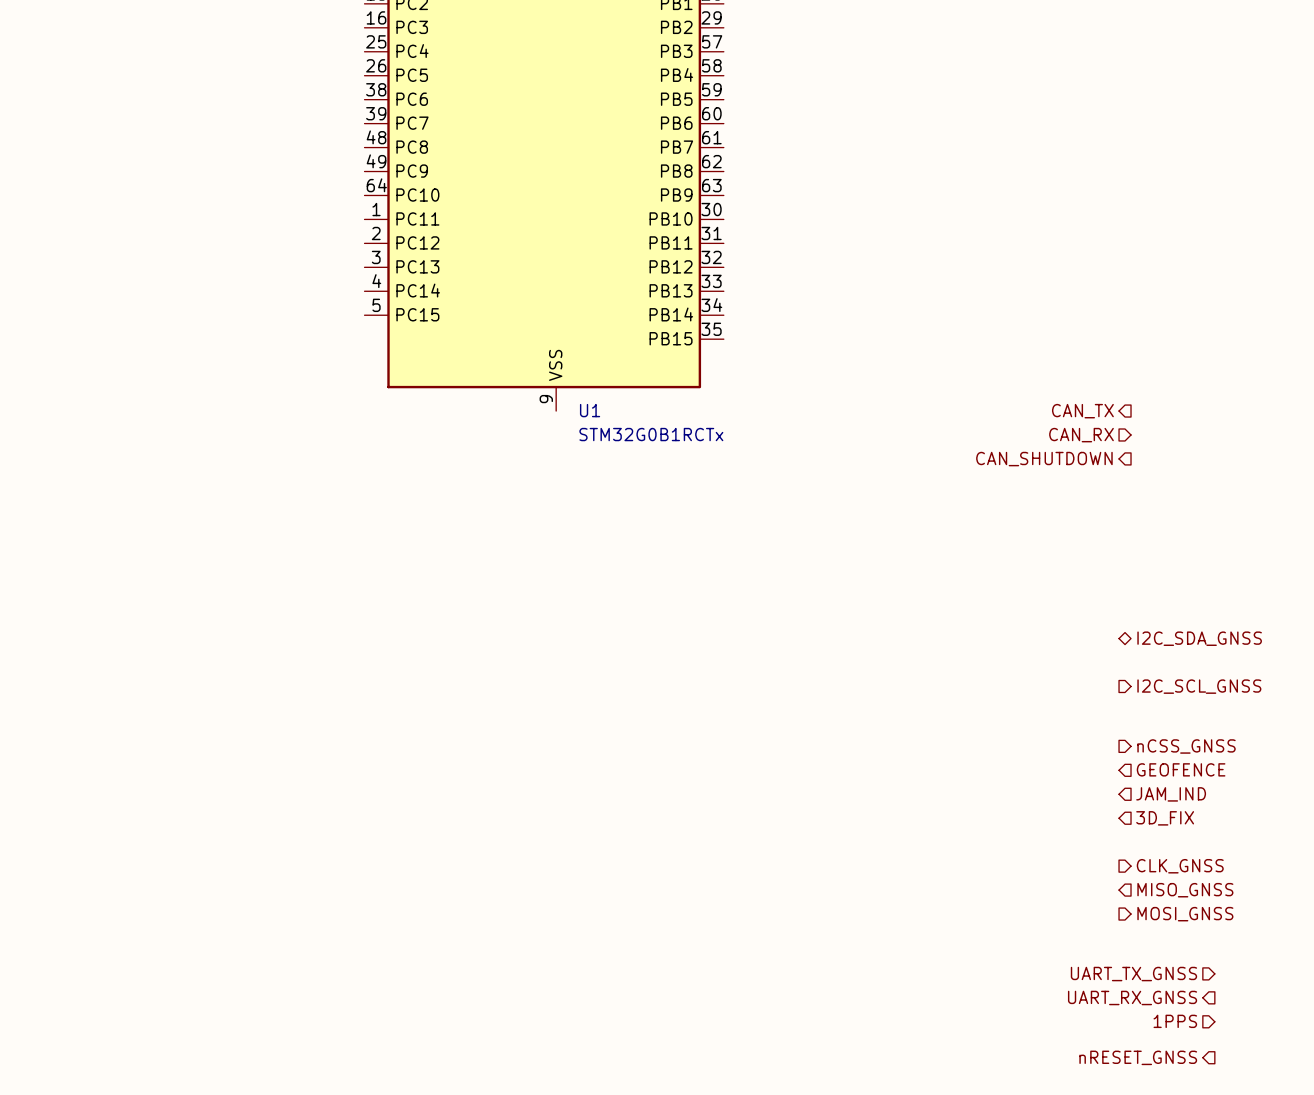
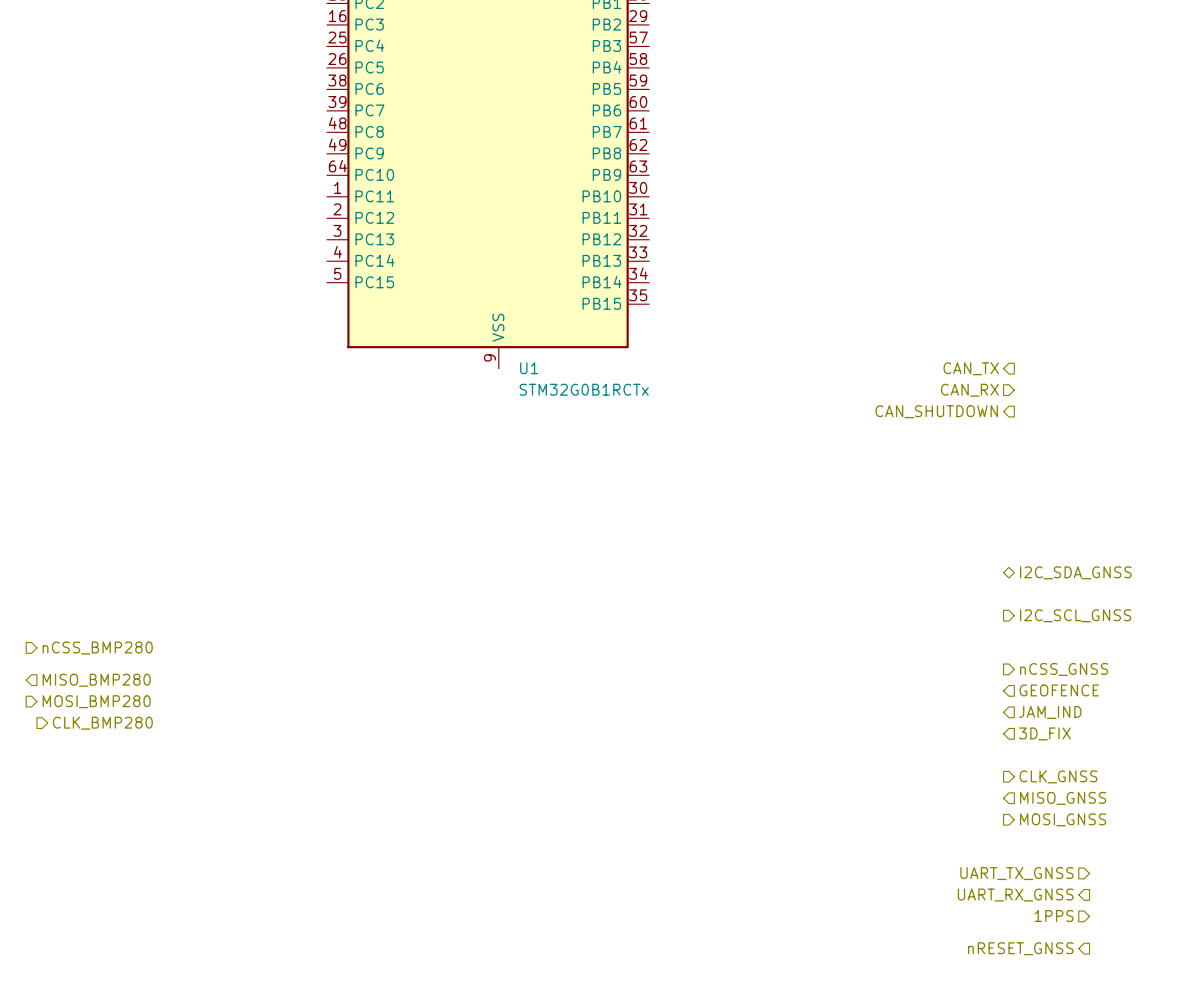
hierarchical label: none -> nCSS_BMP280 (97, 648)
hierarchical label: none -> MISO_BMP280 (96, 680)
hierarchical label: none -> MOSI_BMP280 (96, 701)
hierarchical label: none -> CLK_BMP280 (102, 723)

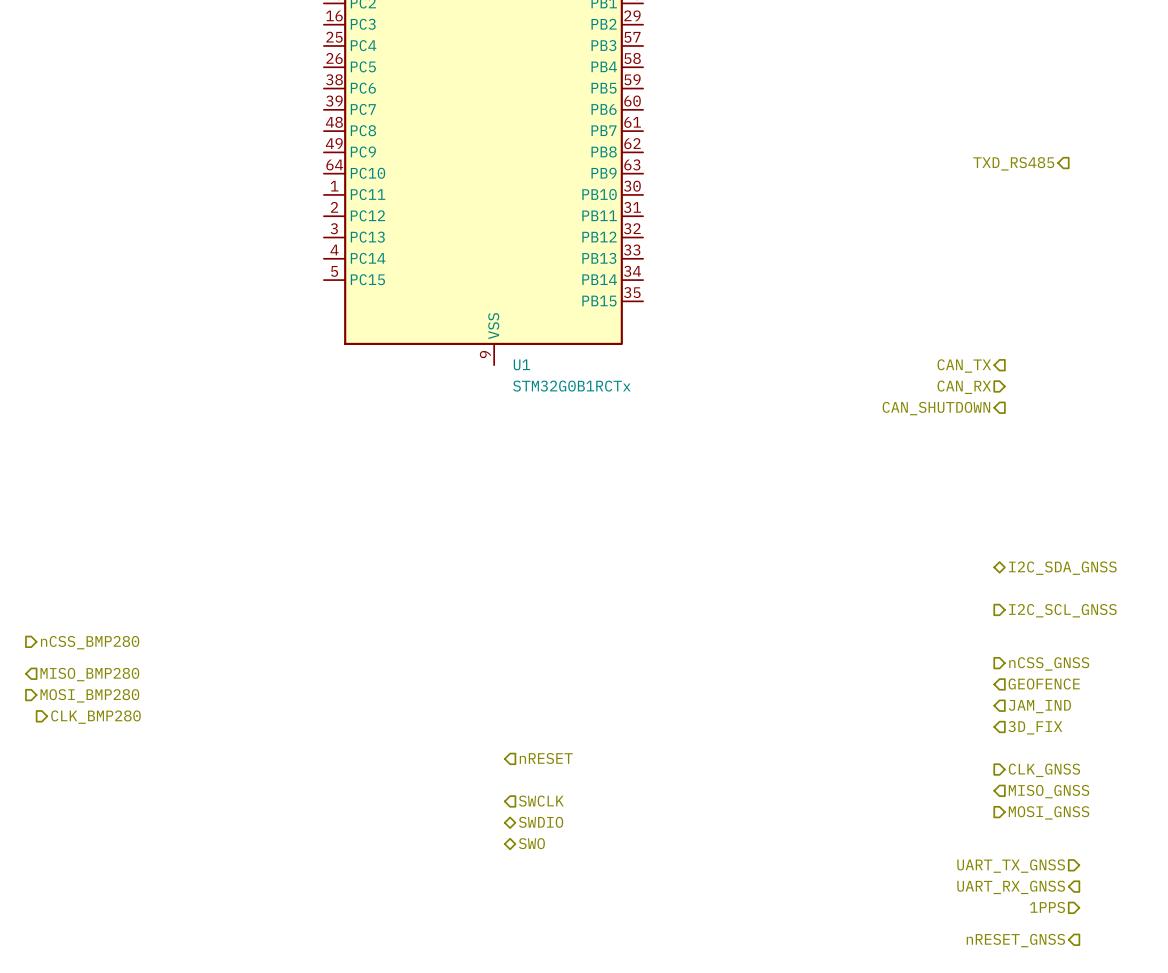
hierarchical label: none -> TXD_RS485 (1013, 163)
hierarchical label: none -> nRESET (546, 758)
hierarchical label: none -> SWCLK (541, 801)
hierarchical label: none -> SWDIO (541, 822)
hierarchical label: none -> SWO (531, 843)

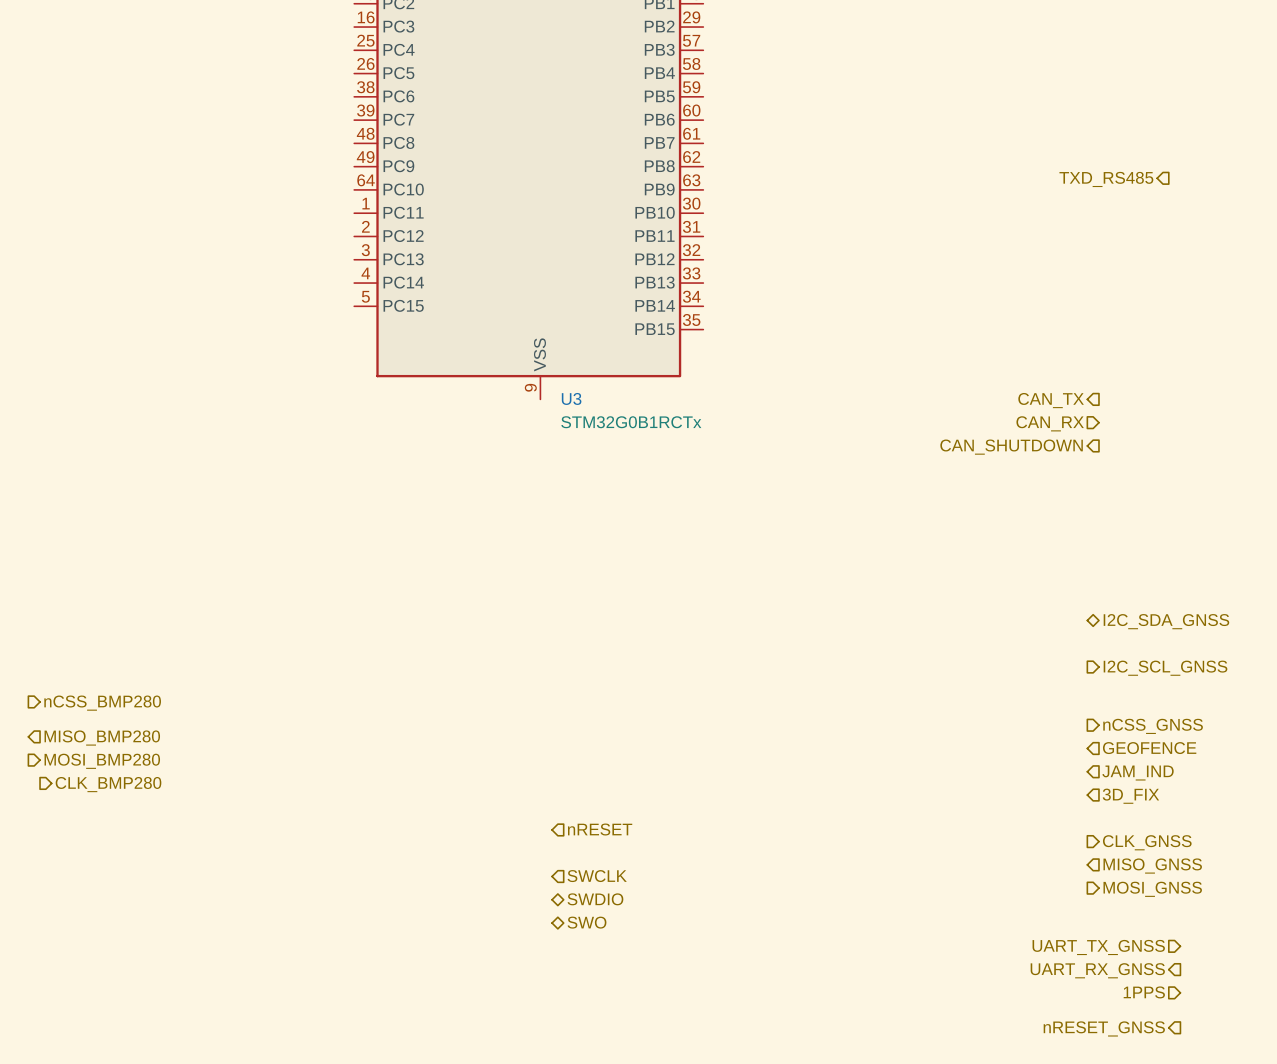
U1 name: U1 (521, 364) -> U3 (571, 398)

